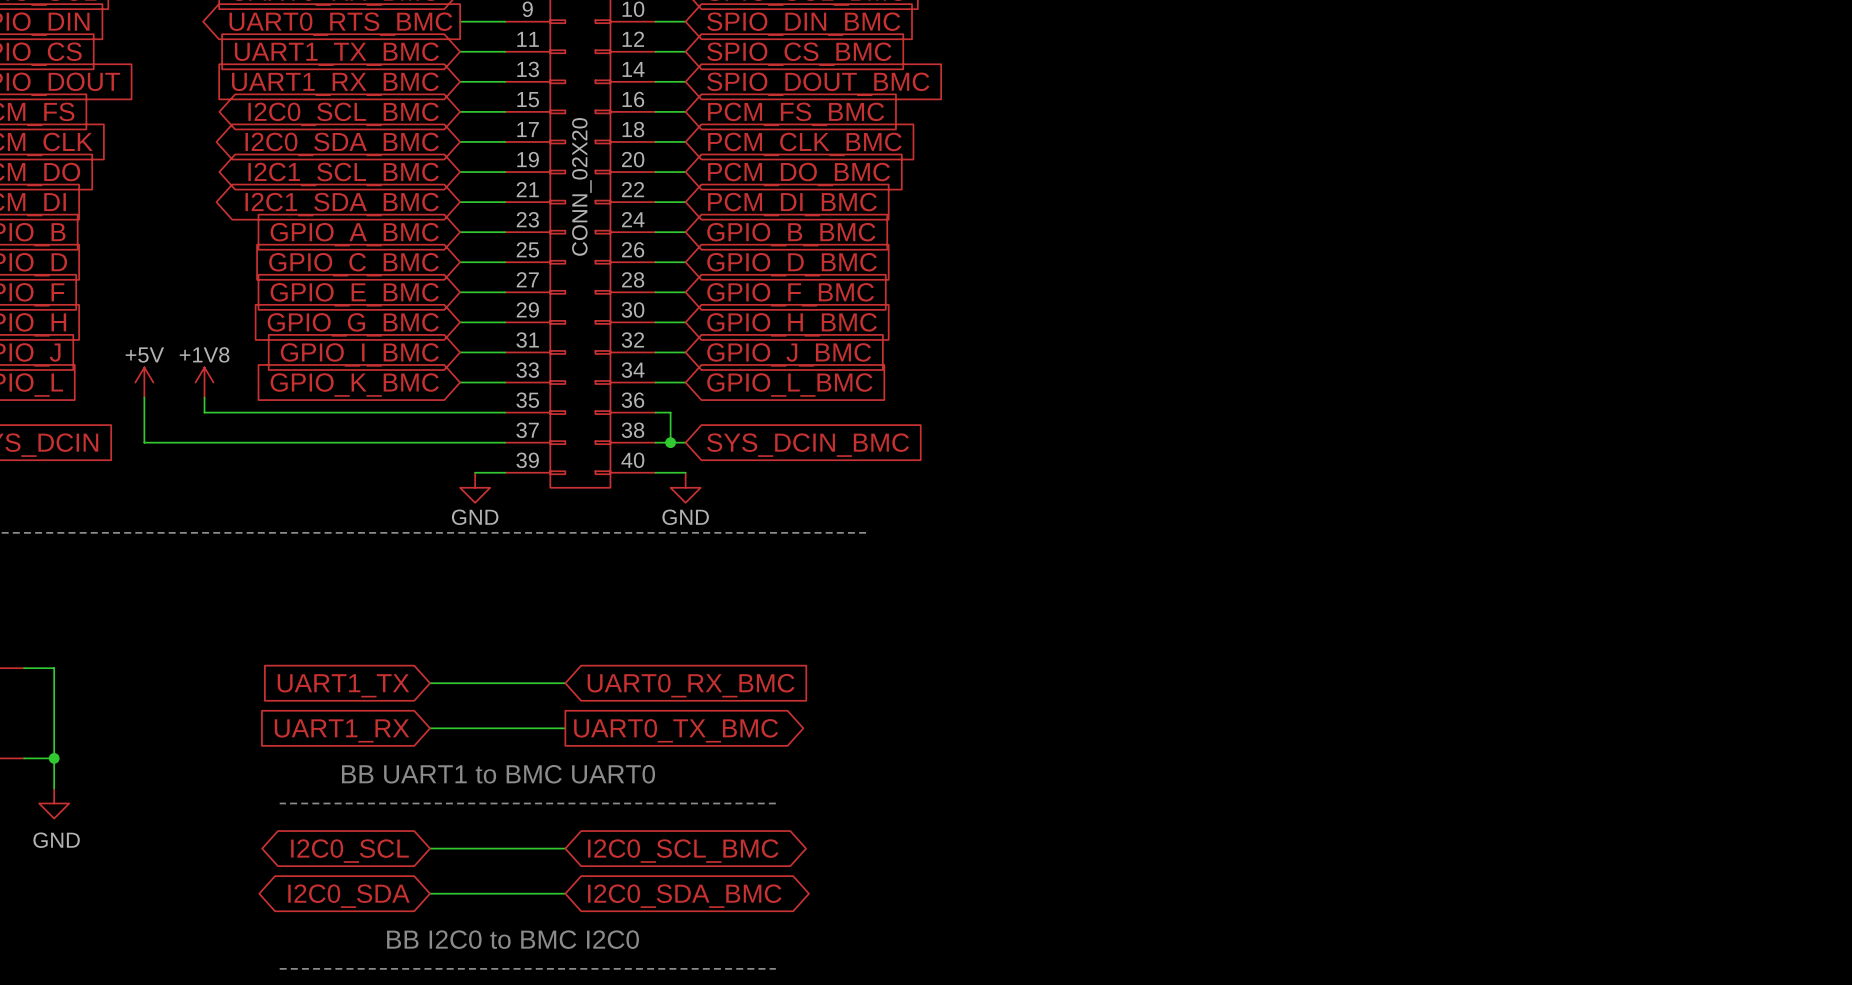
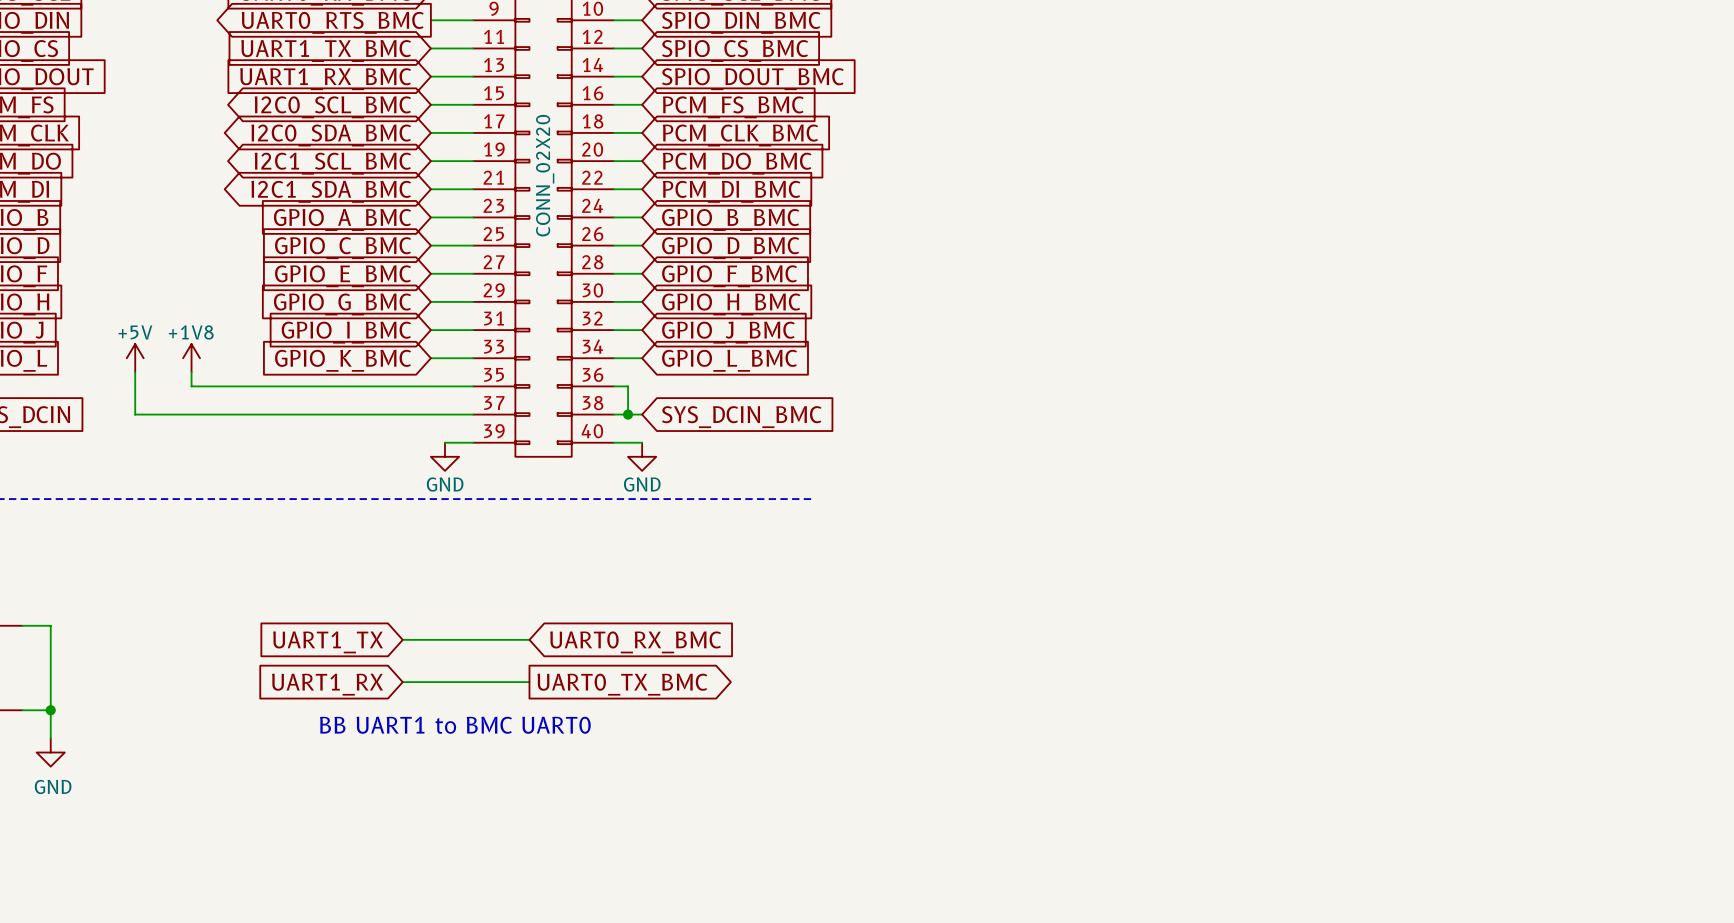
line: (279, 803) (775, 803) -> none
wire: (430, 848) (565, 848) -> none
global label: I2C0_SCL (350, 851) -> none
global label: I2C0_SCL_BMC (683, 851) -> none
wire: (430, 893) (565, 893) -> none
global label: I2C0_SDA (348, 896) -> none
global label: I2C0_SDA_BMC (684, 896) -> none
text: BB I2C0 to BMC I2C0 (513, 939) -> none
line: (279, 968) (775, 968) -> none

